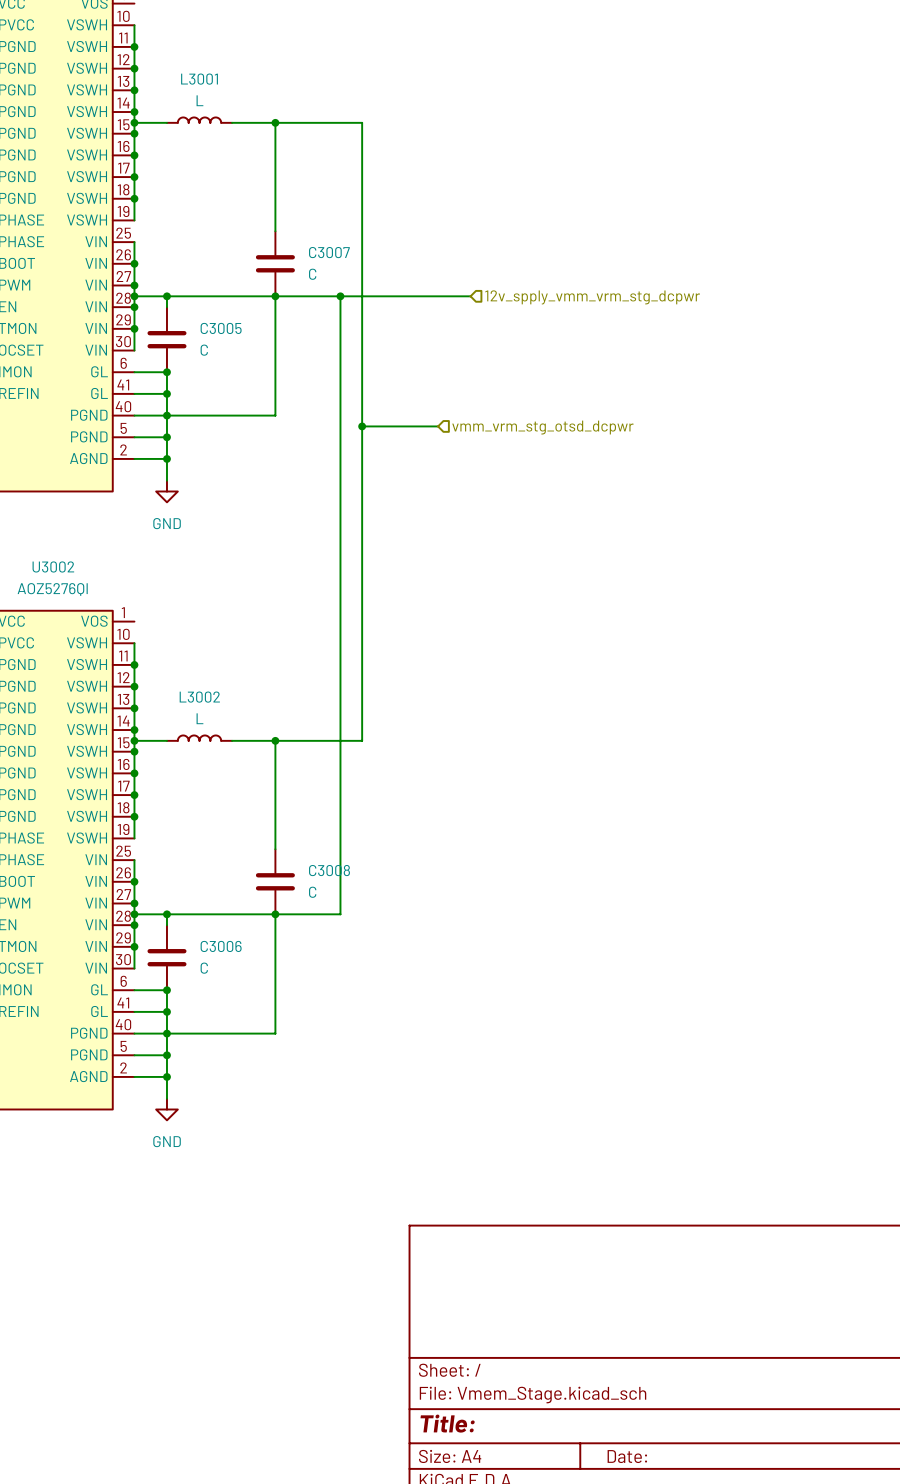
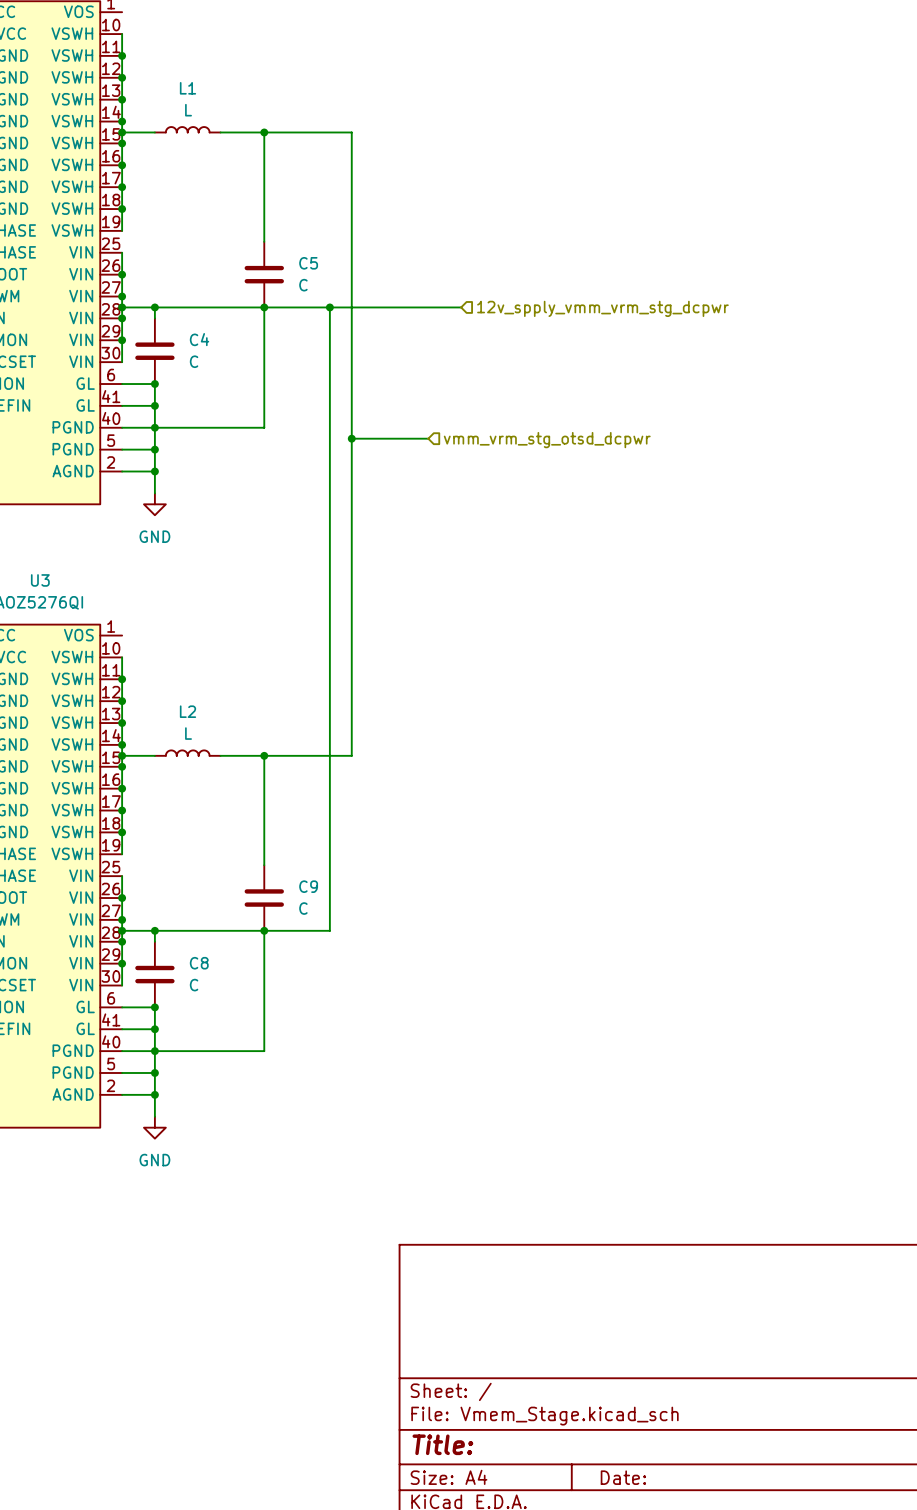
L3001 name: L3001 (199, 79) -> L1 (187, 88)
C3007 name: C3007 (329, 252) -> C5 (308, 263)
C3005 name: C3005 (221, 328) -> C4 (199, 339)
U3002 name: U3002 (53, 566) -> U3 (40, 580)
L3002 name: L3002 (199, 697) -> L2 (187, 711)
C3008 name: C3008 (329, 870) -> C9 (308, 886)
C3006 name: C3006 (221, 946) -> C8 (199, 963)

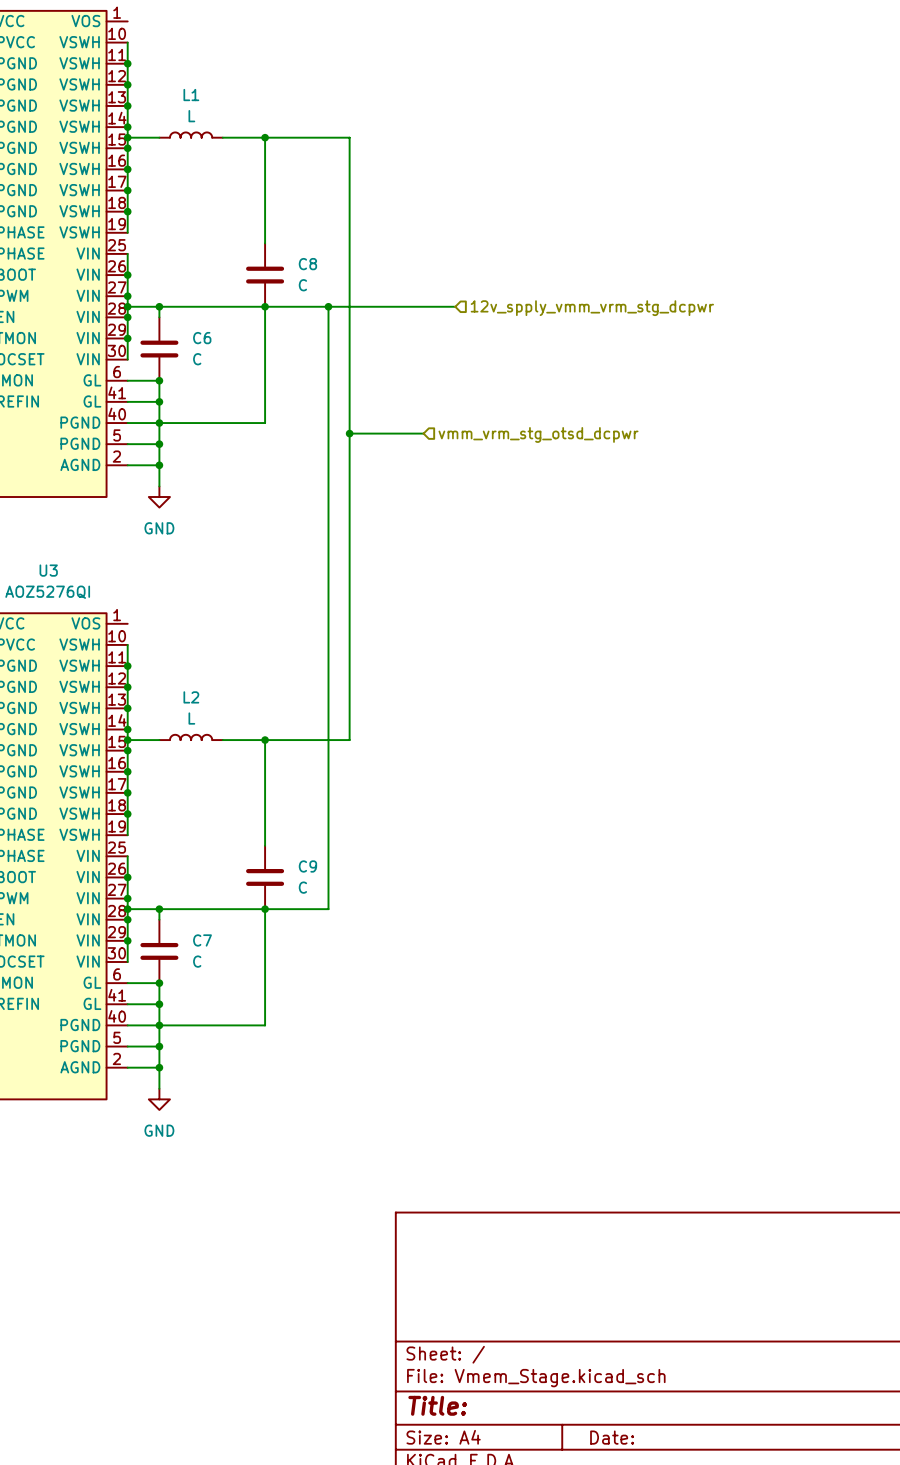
C5 name: C5 (308, 263) -> C8 (307, 264)
C4 name: C4 (199, 339) -> C6 (202, 338)
C8 name: C8 (199, 963) -> C7 (202, 940)

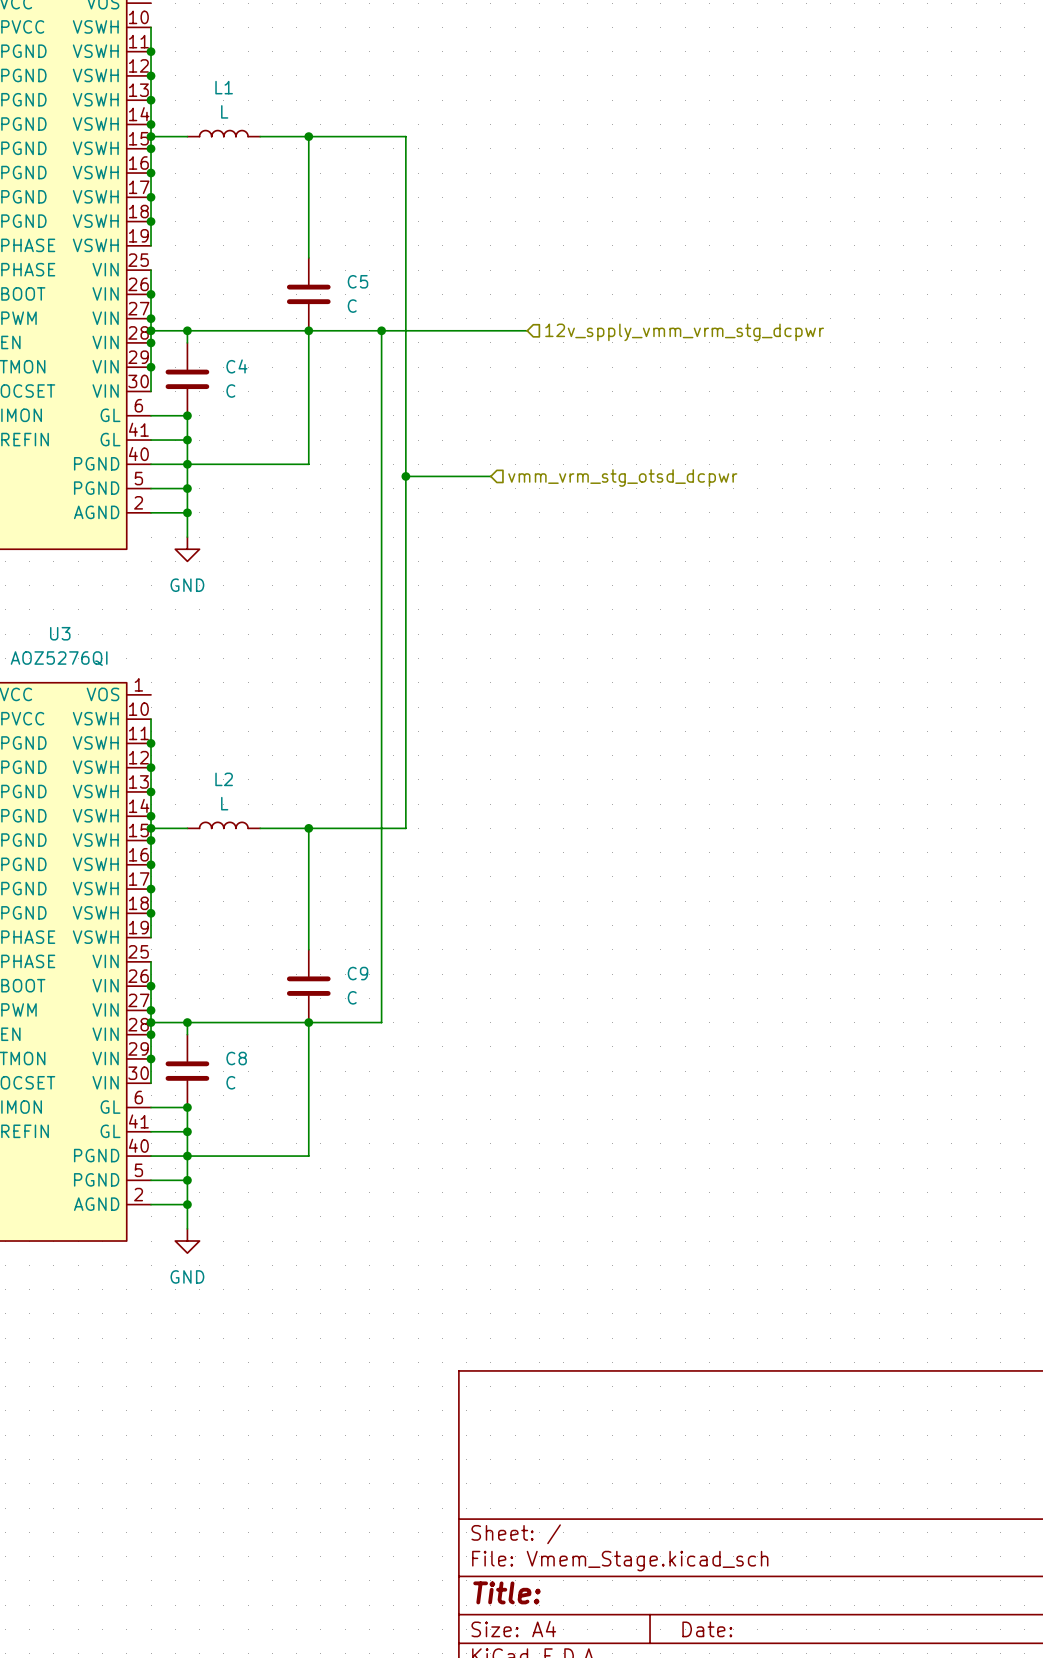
C8 name: C8 (307, 264) -> C5 (357, 281)
C6 name: C6 (202, 338) -> C4 (236, 366)
C7 name: C7 (202, 940) -> C8 (236, 1058)

